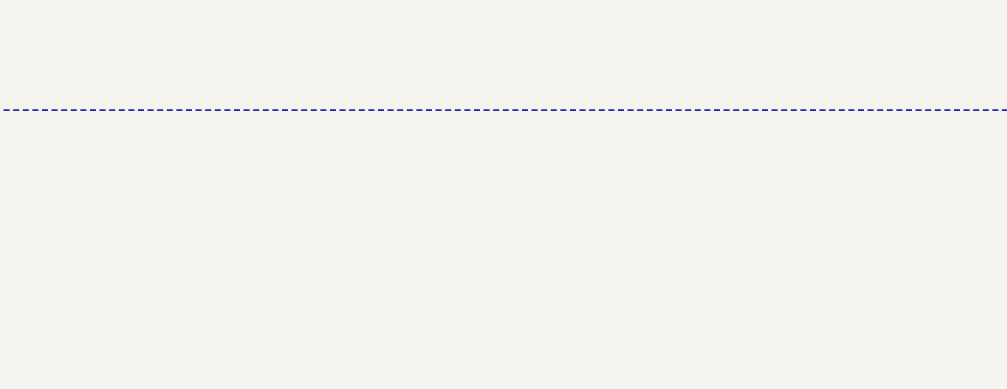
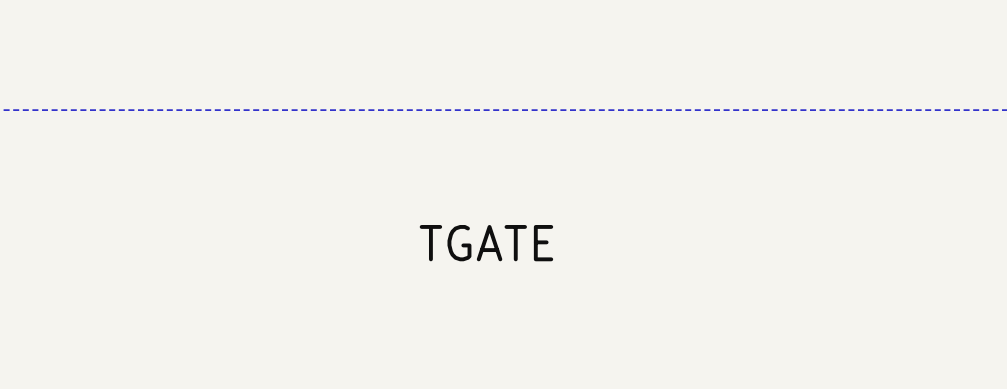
label: none -> TGATE (486, 243)

